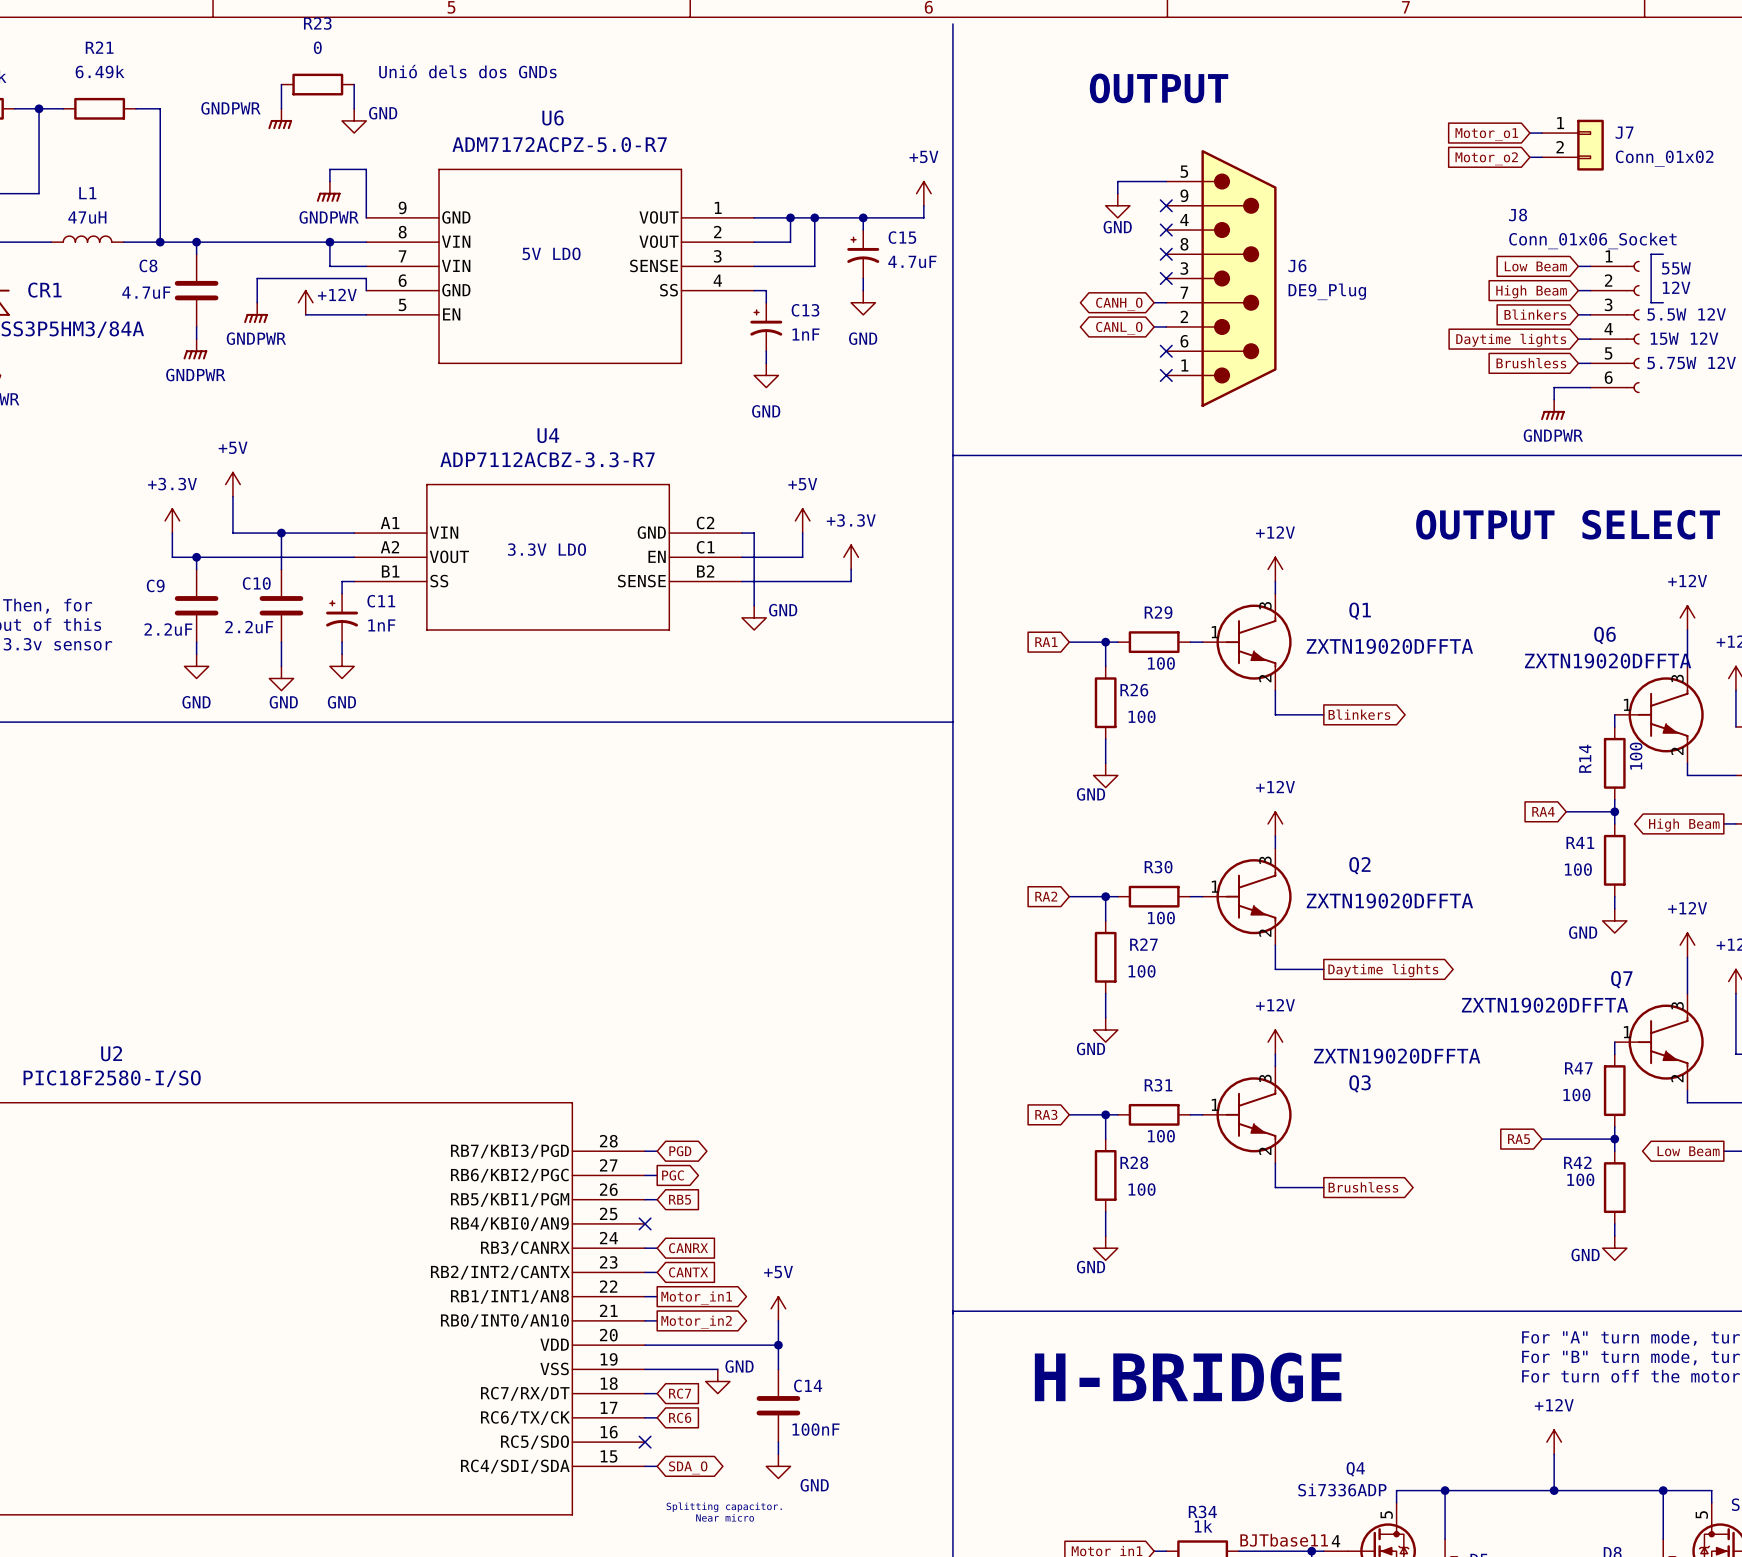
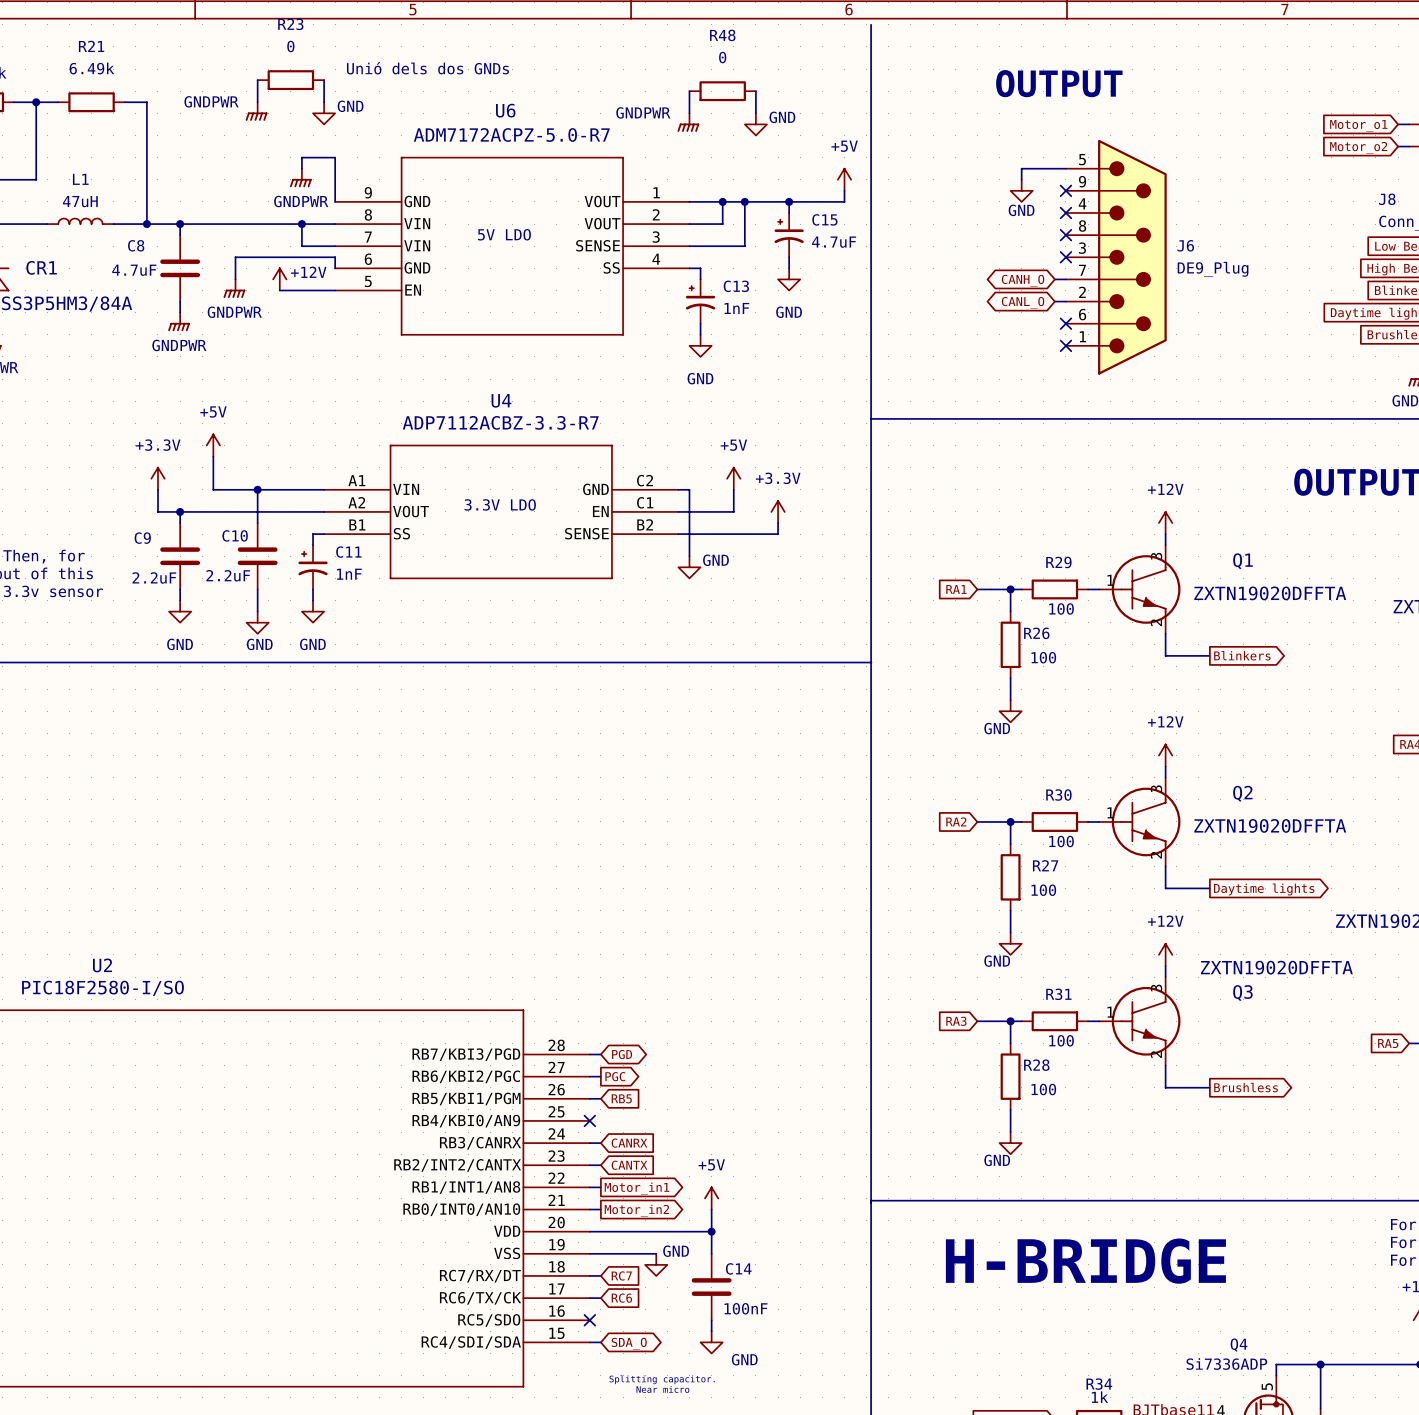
wire: none -> (689, 91) (689, 113)
R48: none -> 0 (722, 91)
wire: none -> (755, 91) (755, 113)
power symbol: none -> GNDPWR (688, 122)
power symbol: none -> GND (755, 124)

